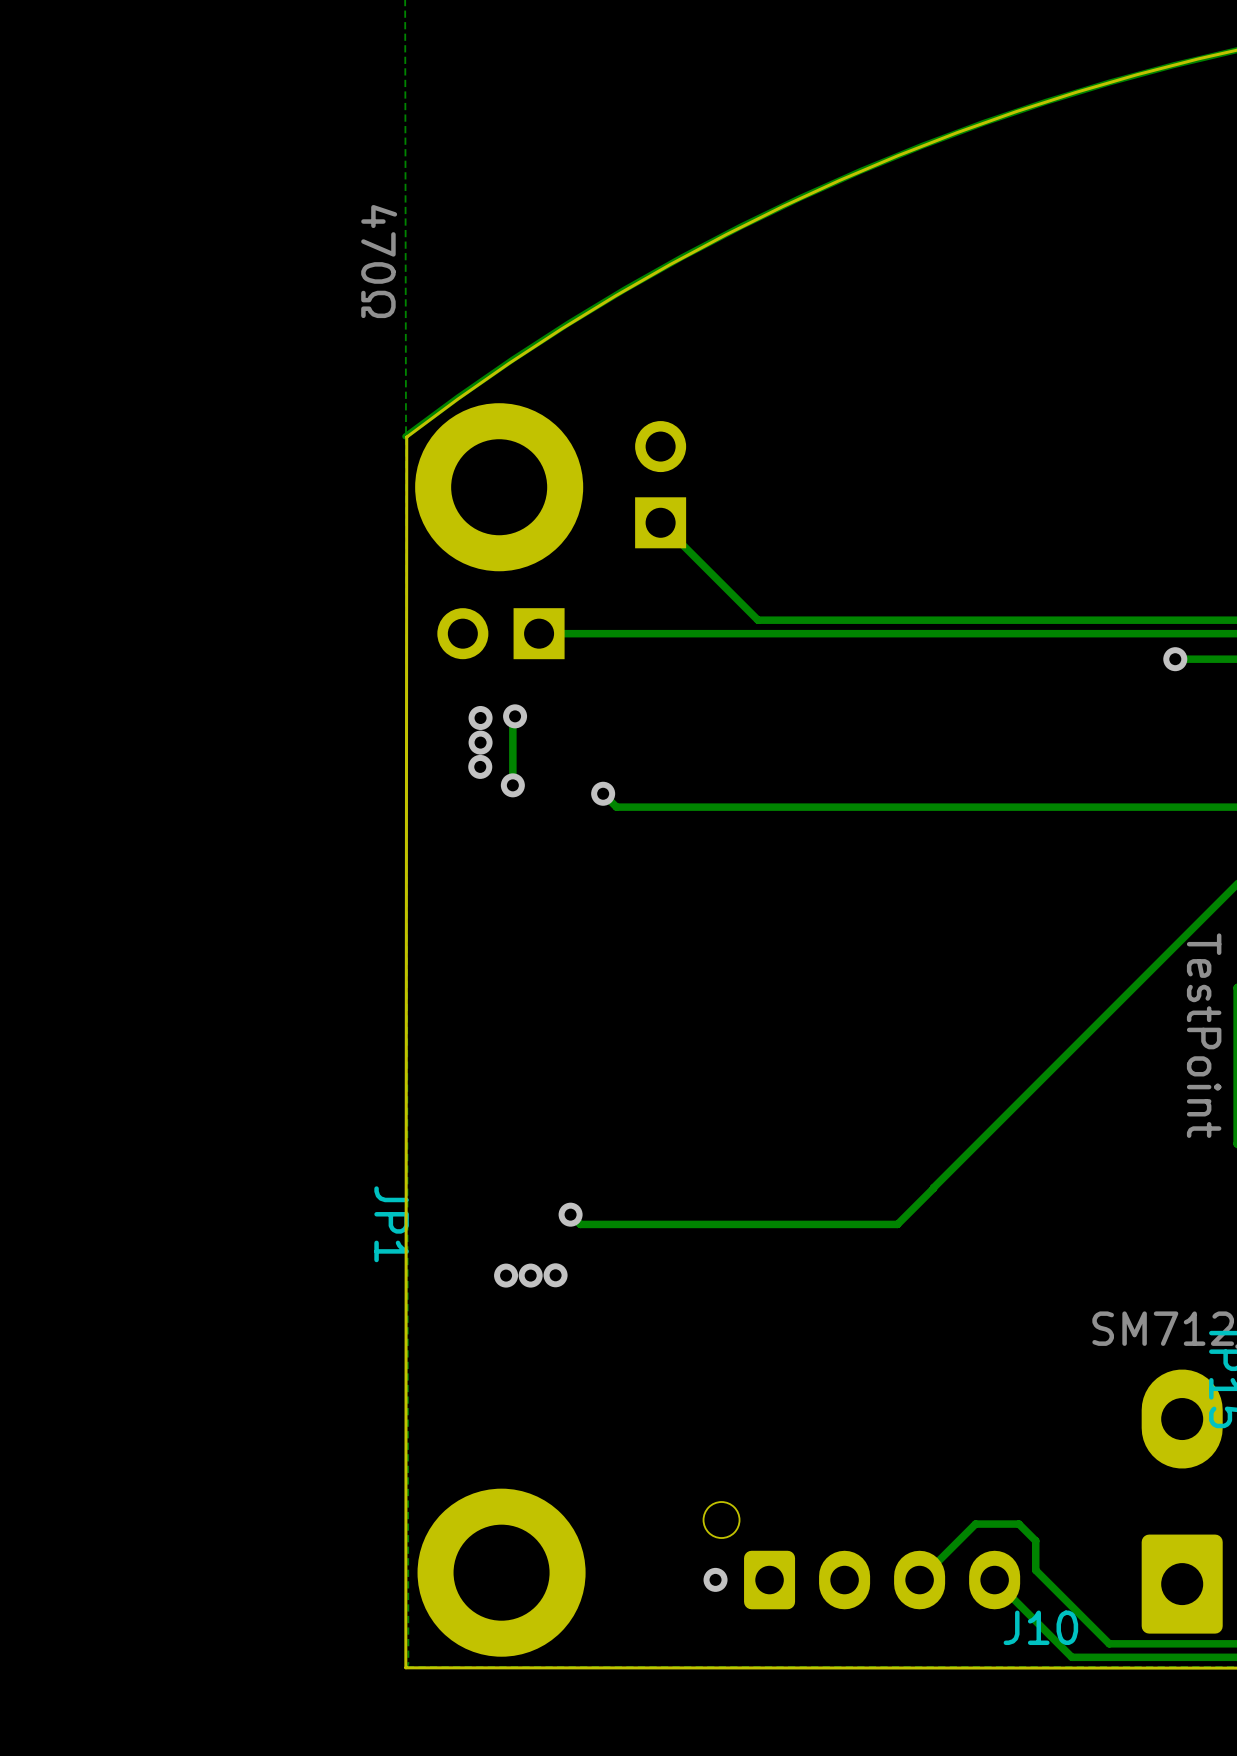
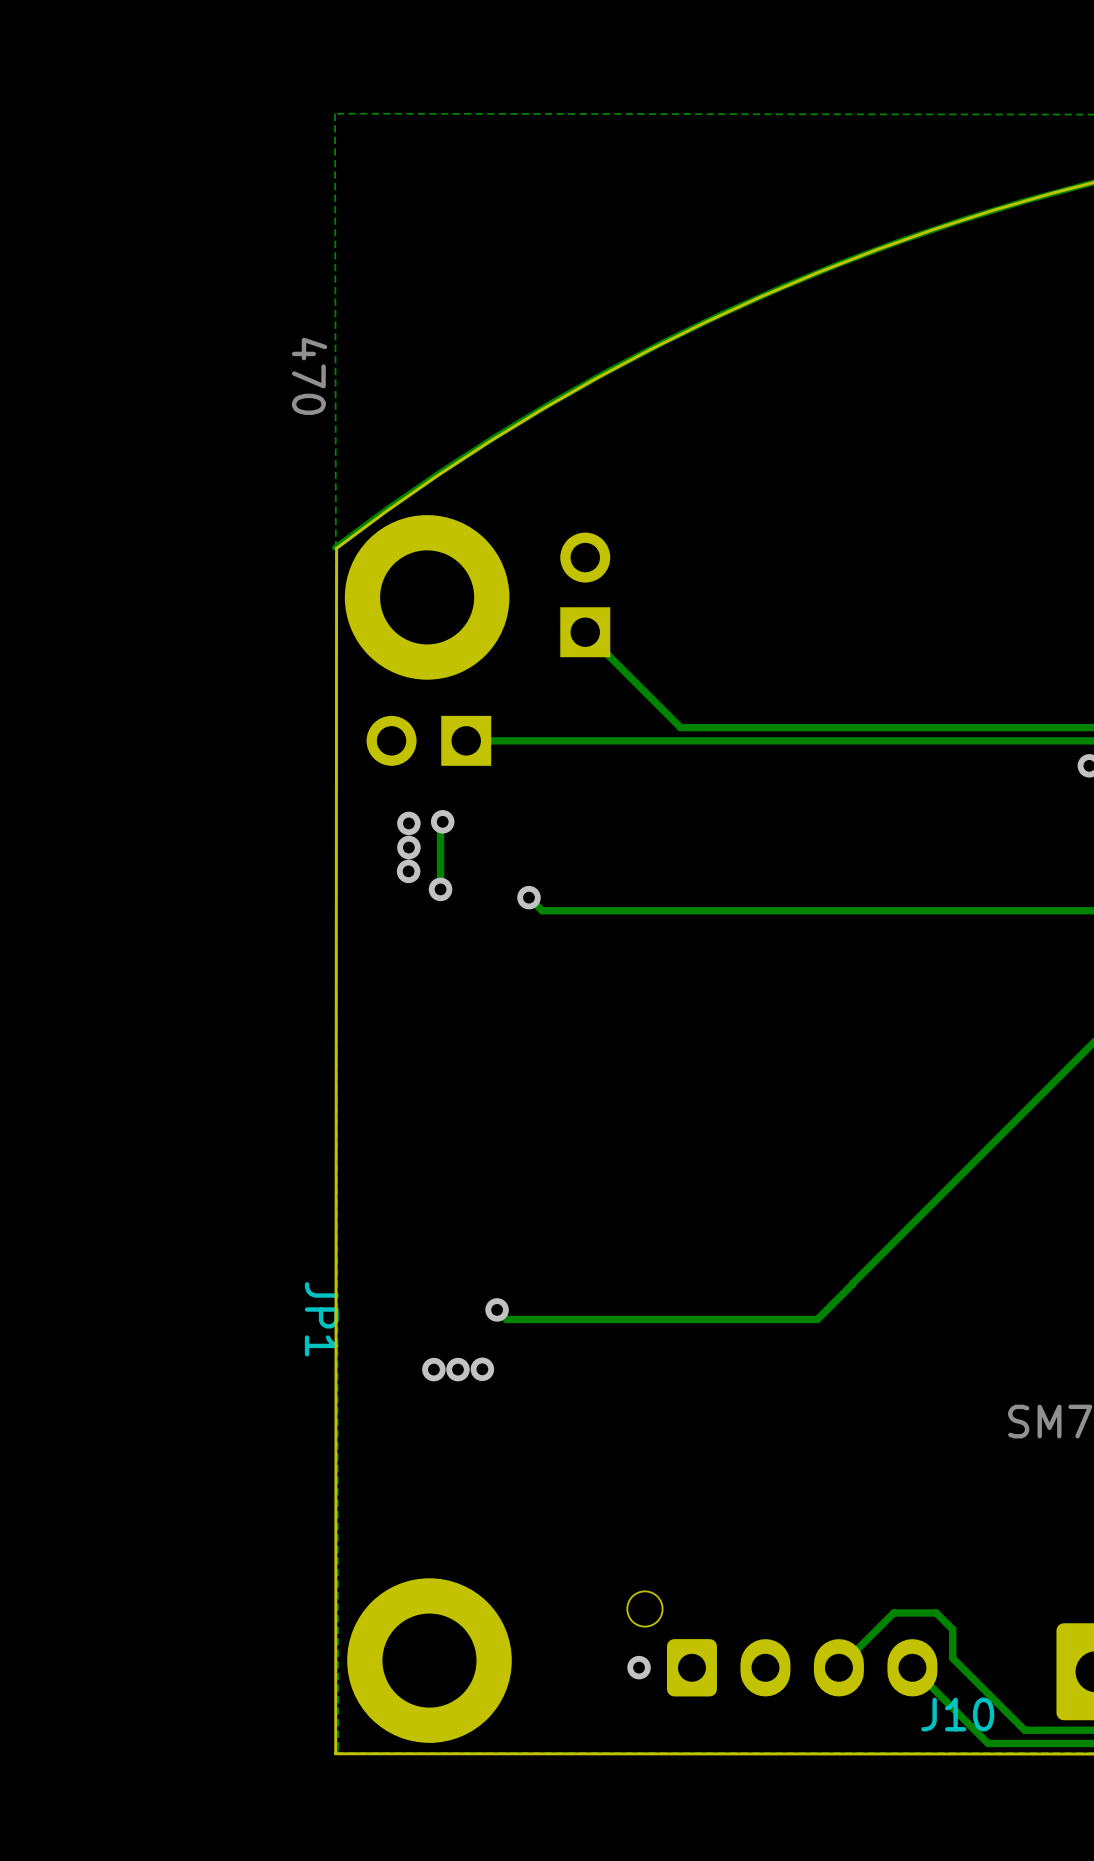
part value: 470Ω (379, 261) -> 470 (309, 376)

